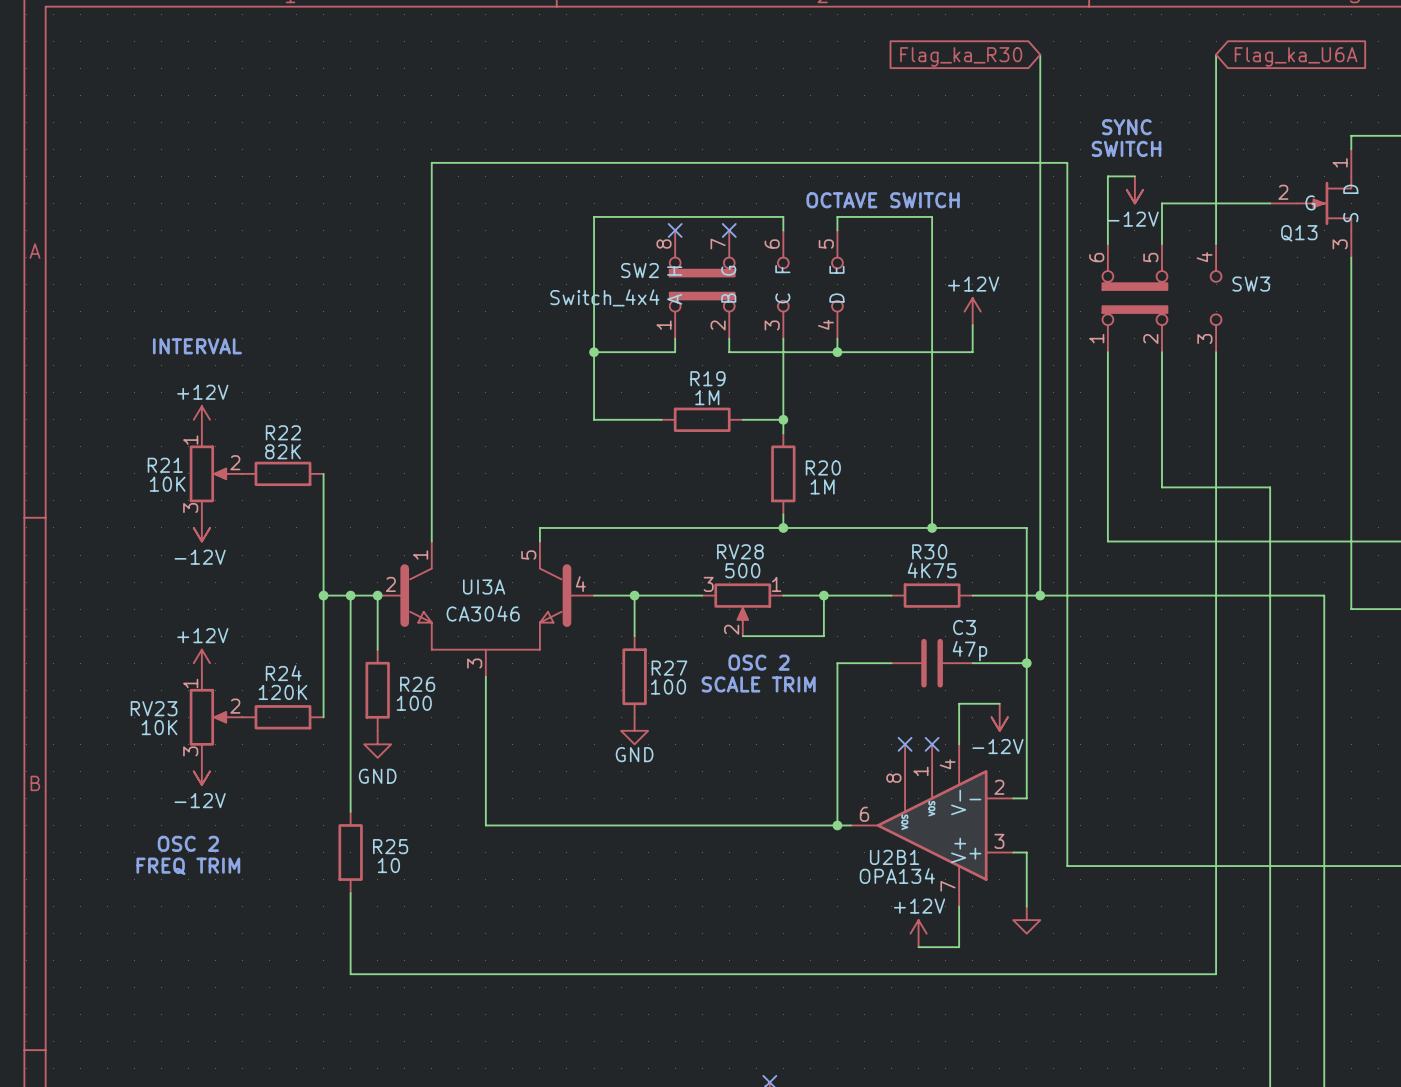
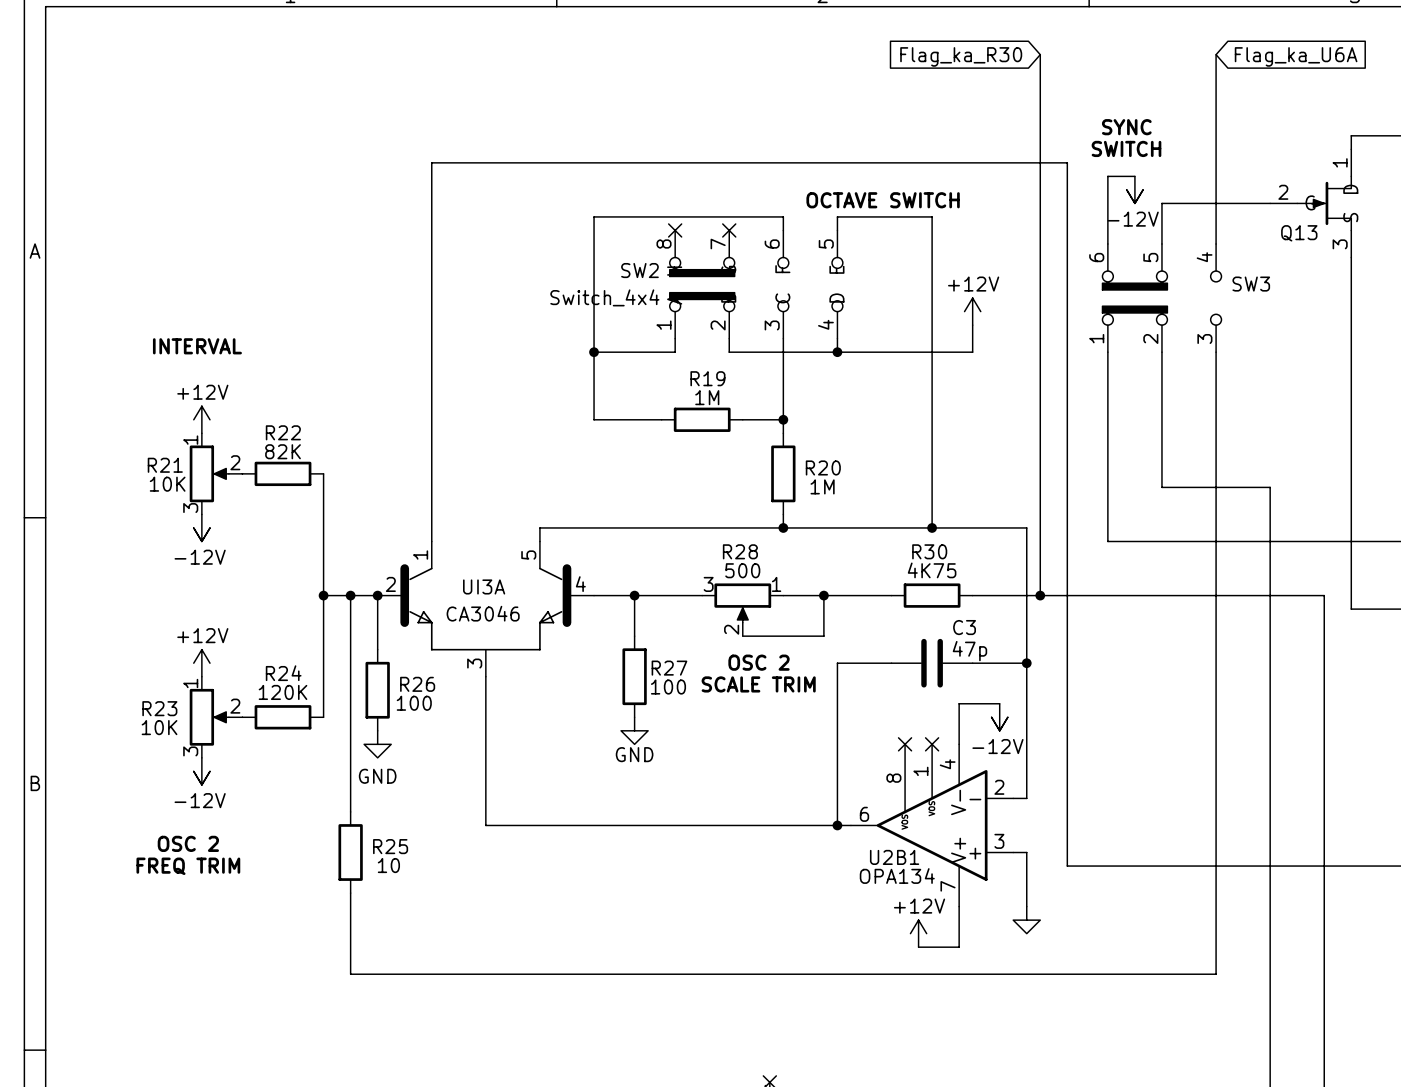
RV28 name: RV28 (740, 551) -> R28 (740, 551)
RV23 name: RV23 (154, 708) -> R23 (159, 708)

